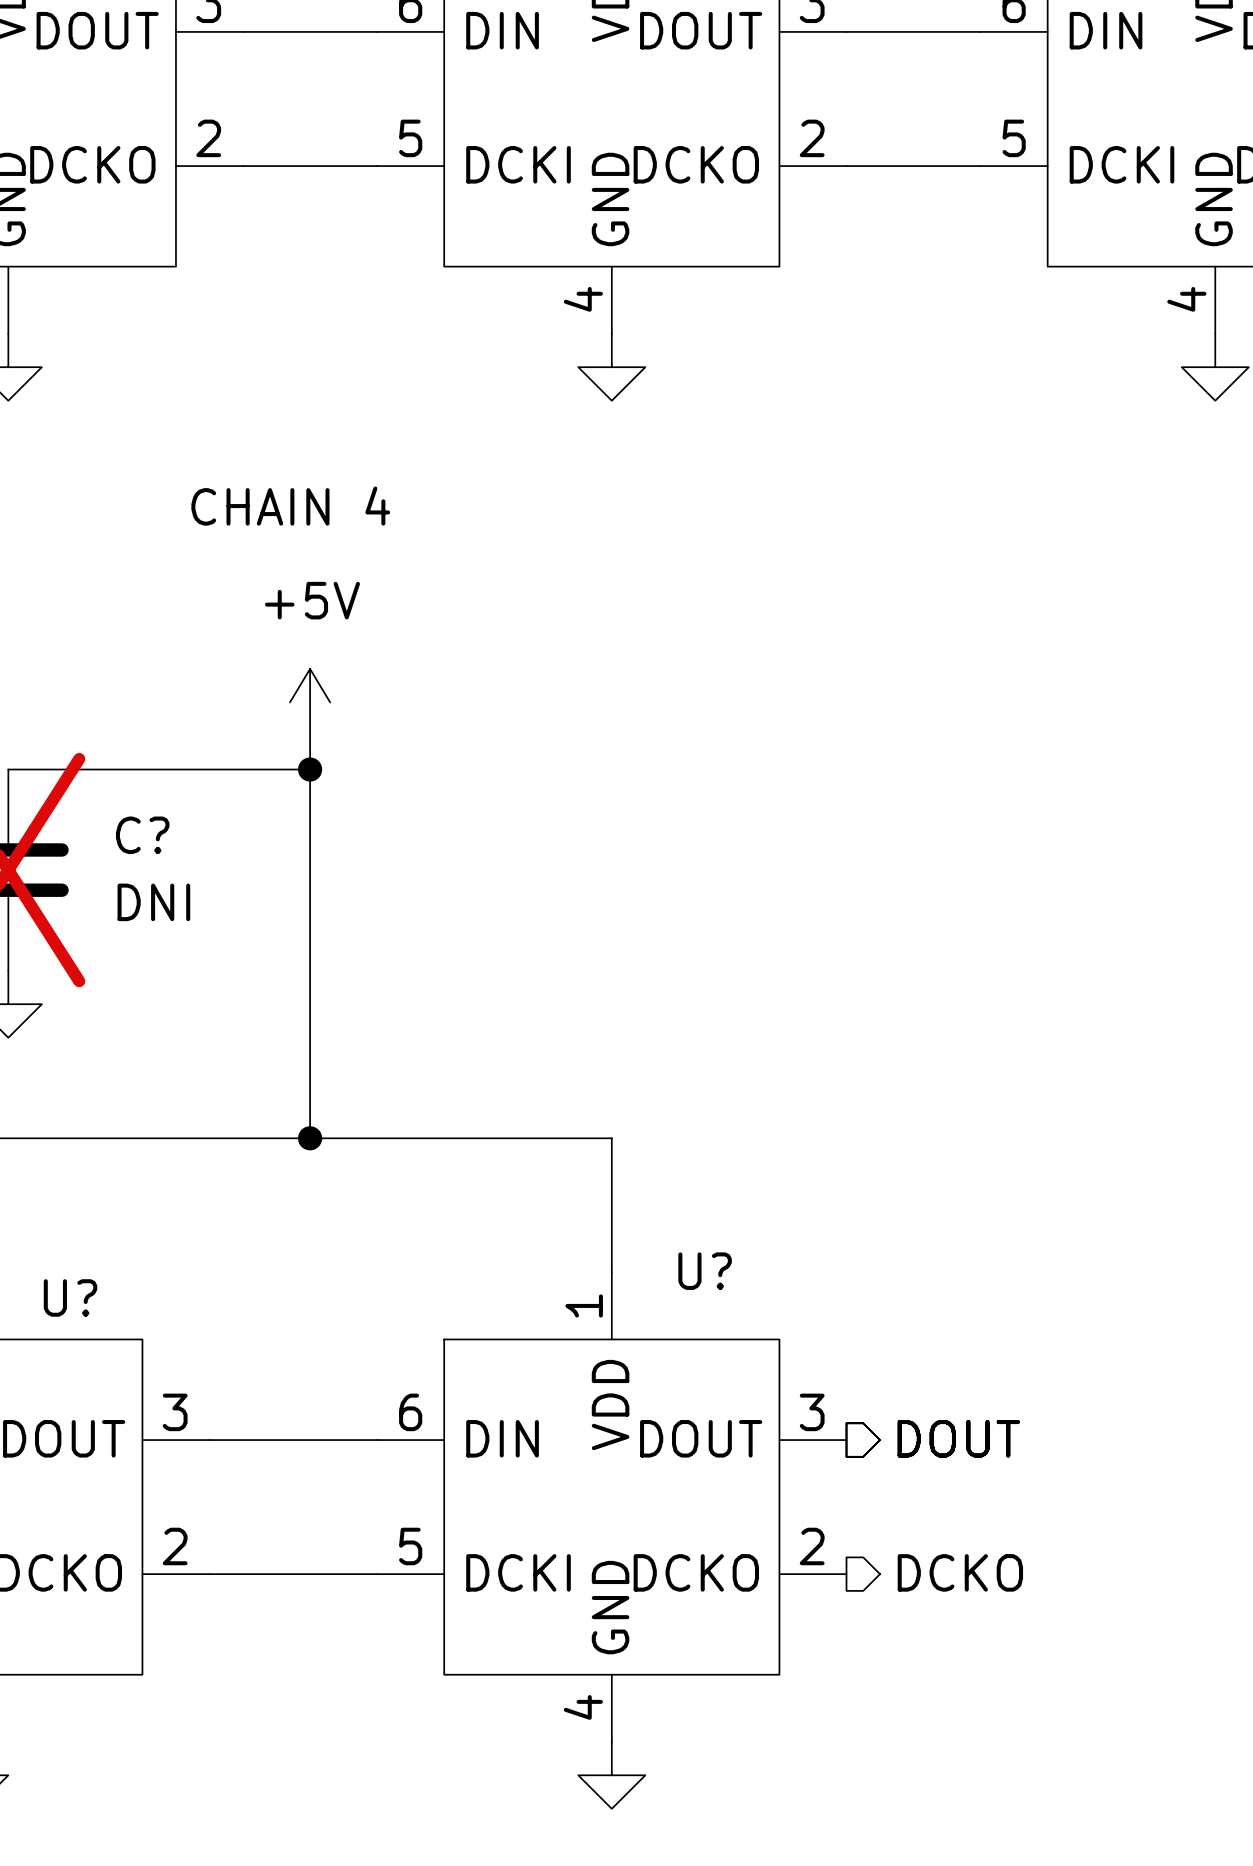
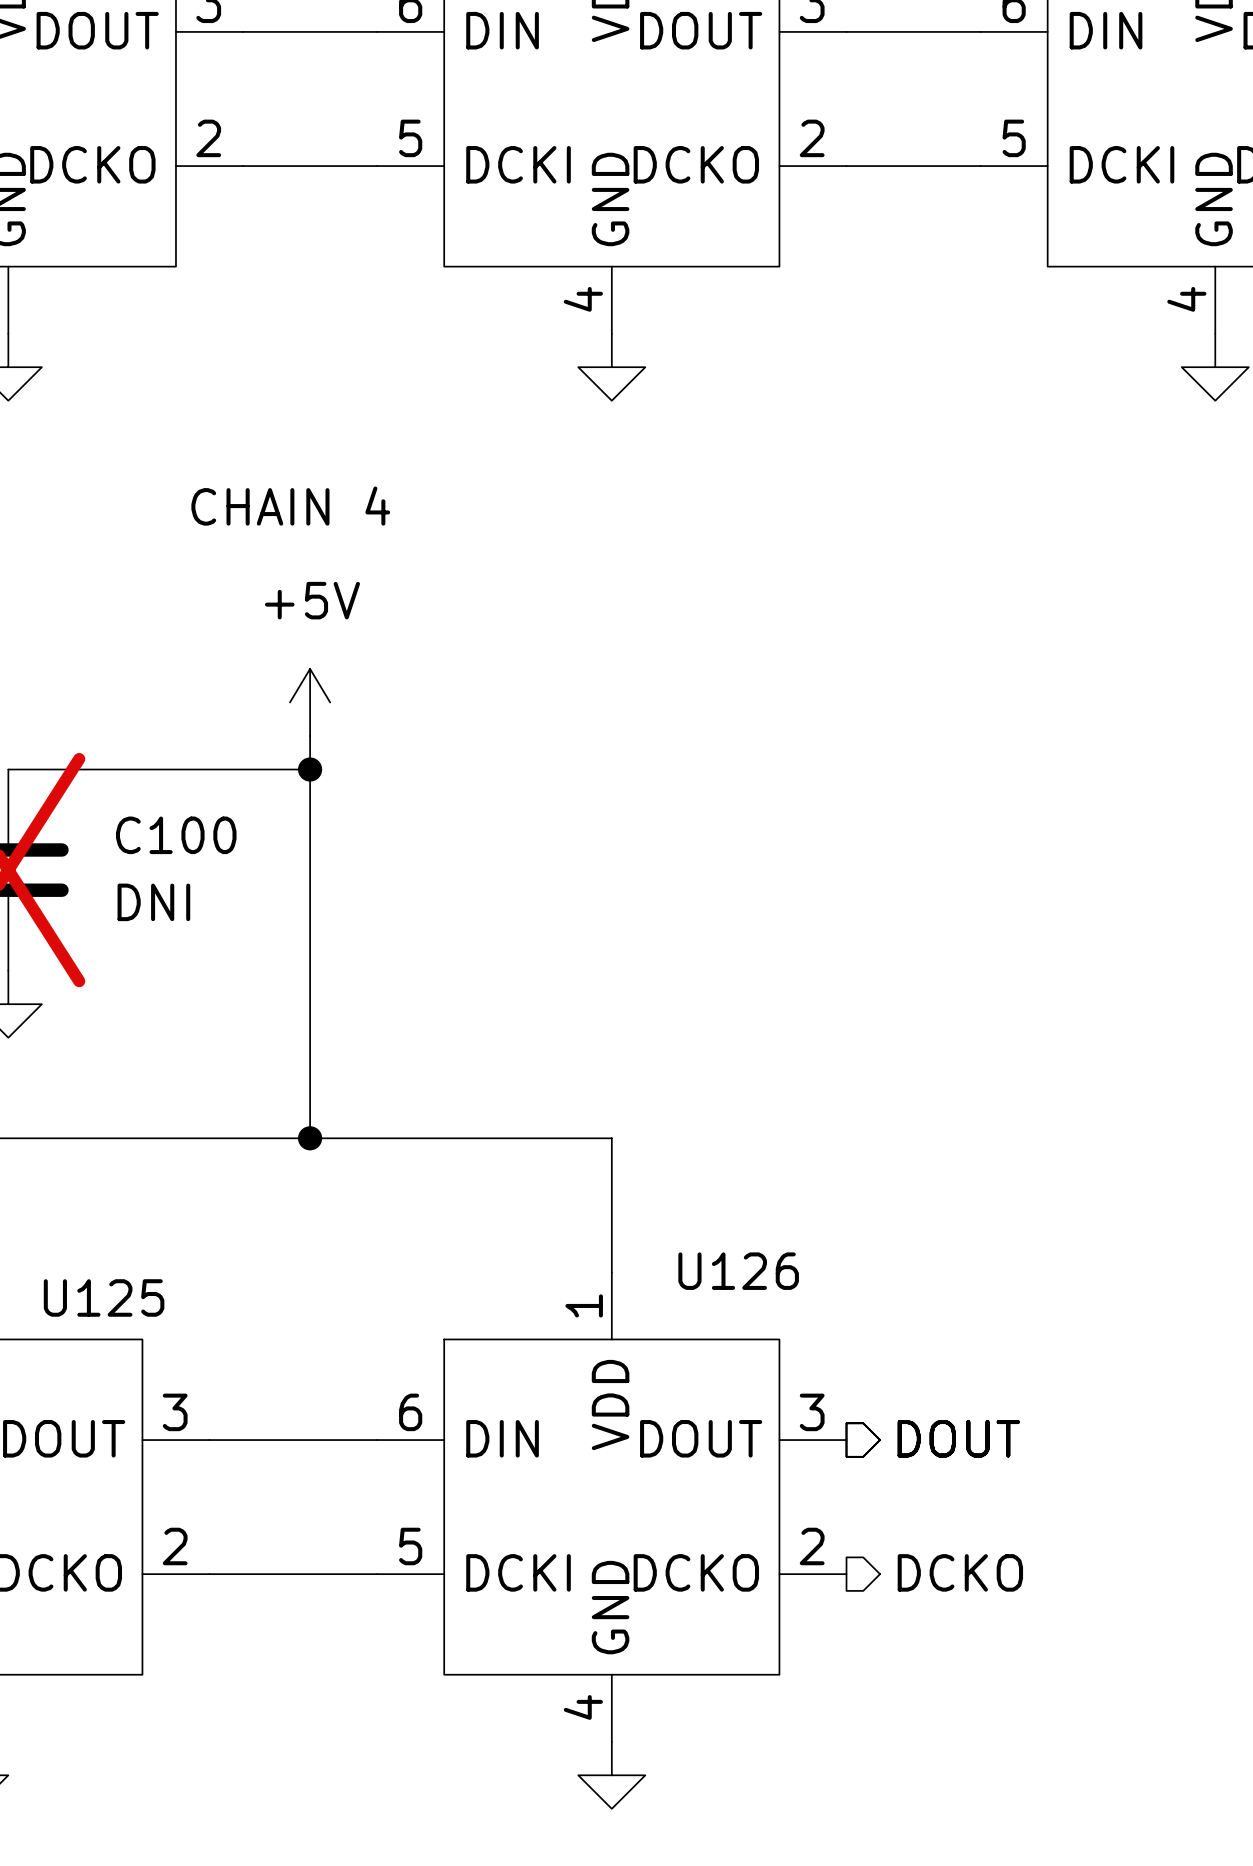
C? name: C? (142, 835) -> C100 (176, 835)
U? name: U? (705, 1271) -> U126 (738, 1271)
U? name: U? (70, 1297) -> U125 (104, 1297)

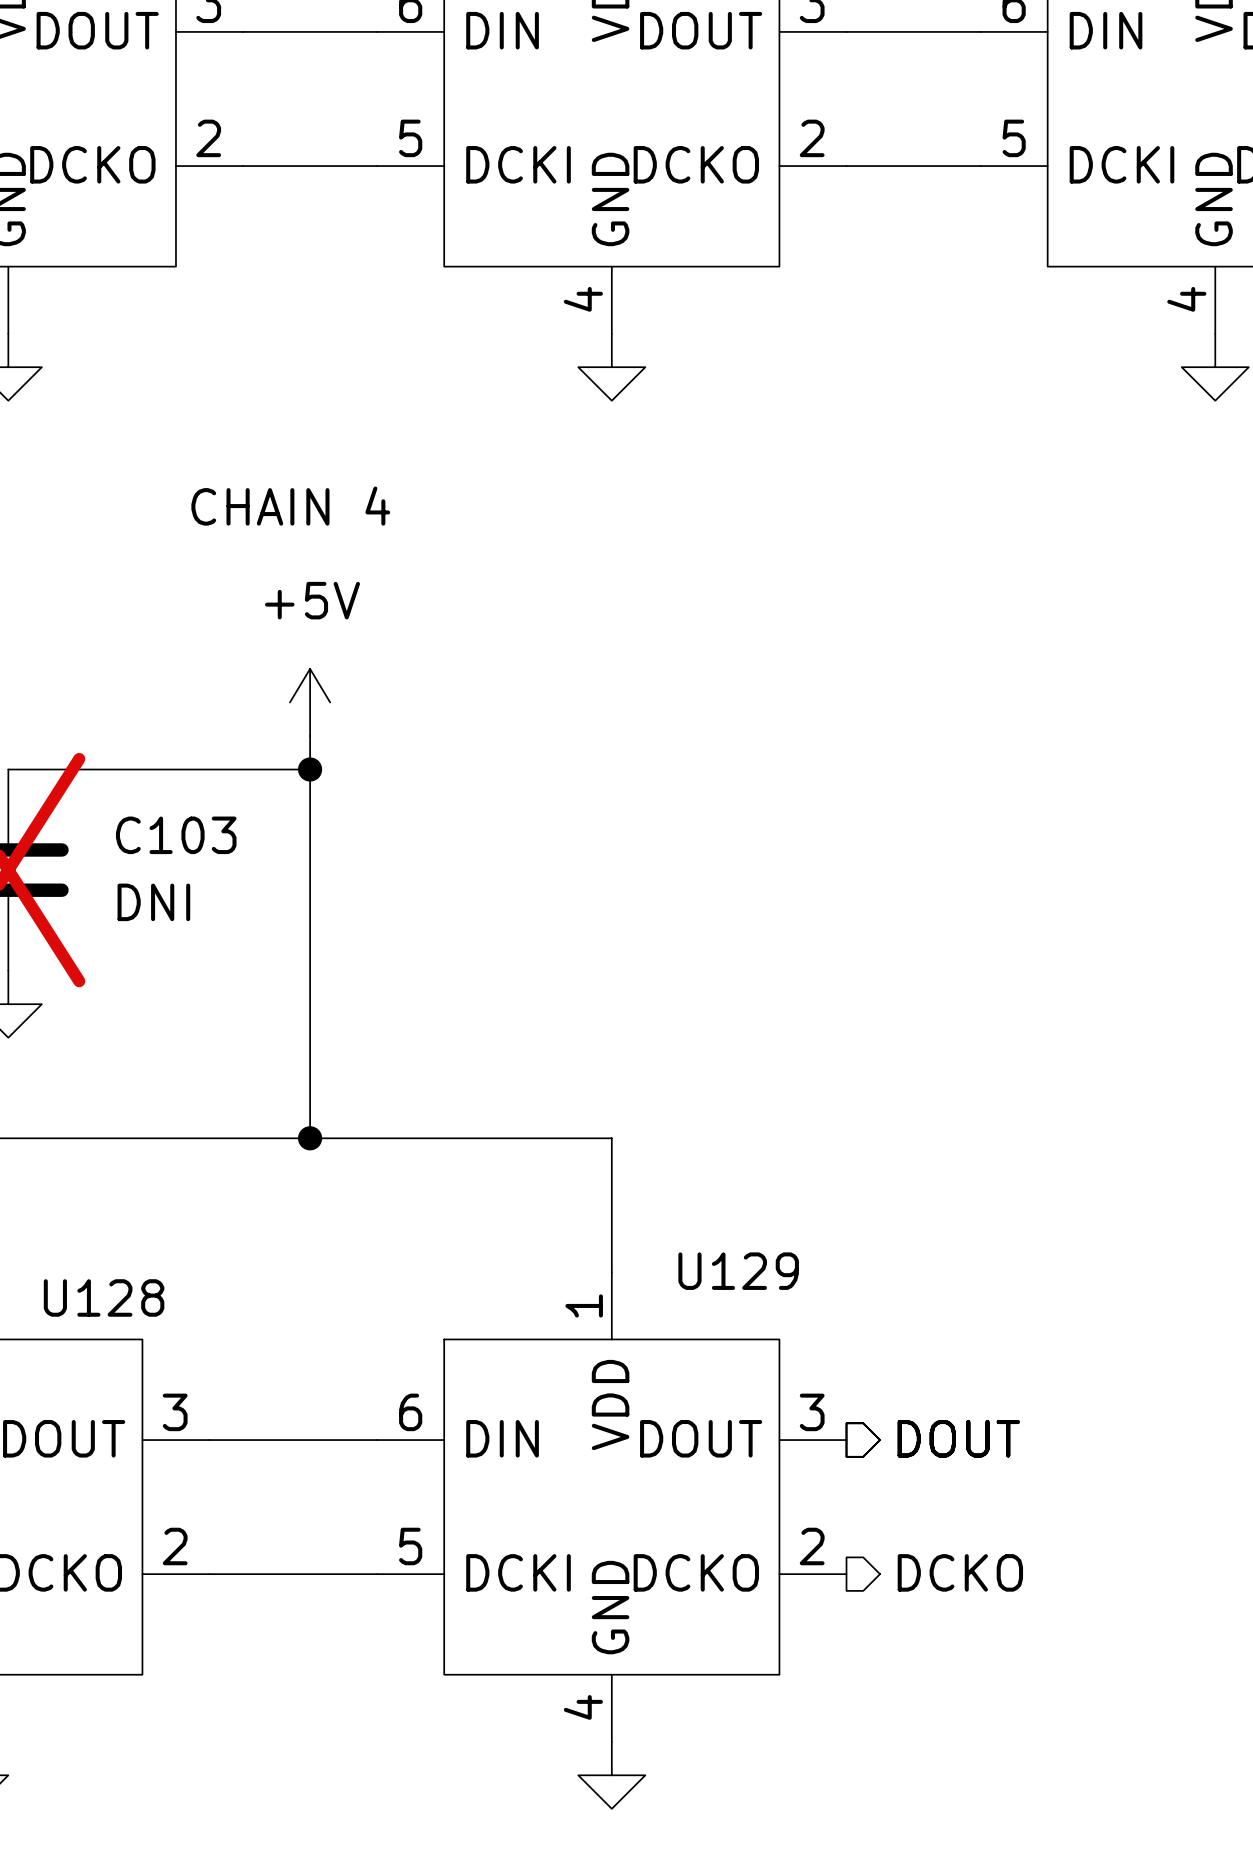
C100 name: C100 (176, 835) -> C103 (176, 835)
U126 name: U126 (738, 1271) -> U129 (738, 1271)
U125 name: U125 (104, 1297) -> U128 (104, 1297)

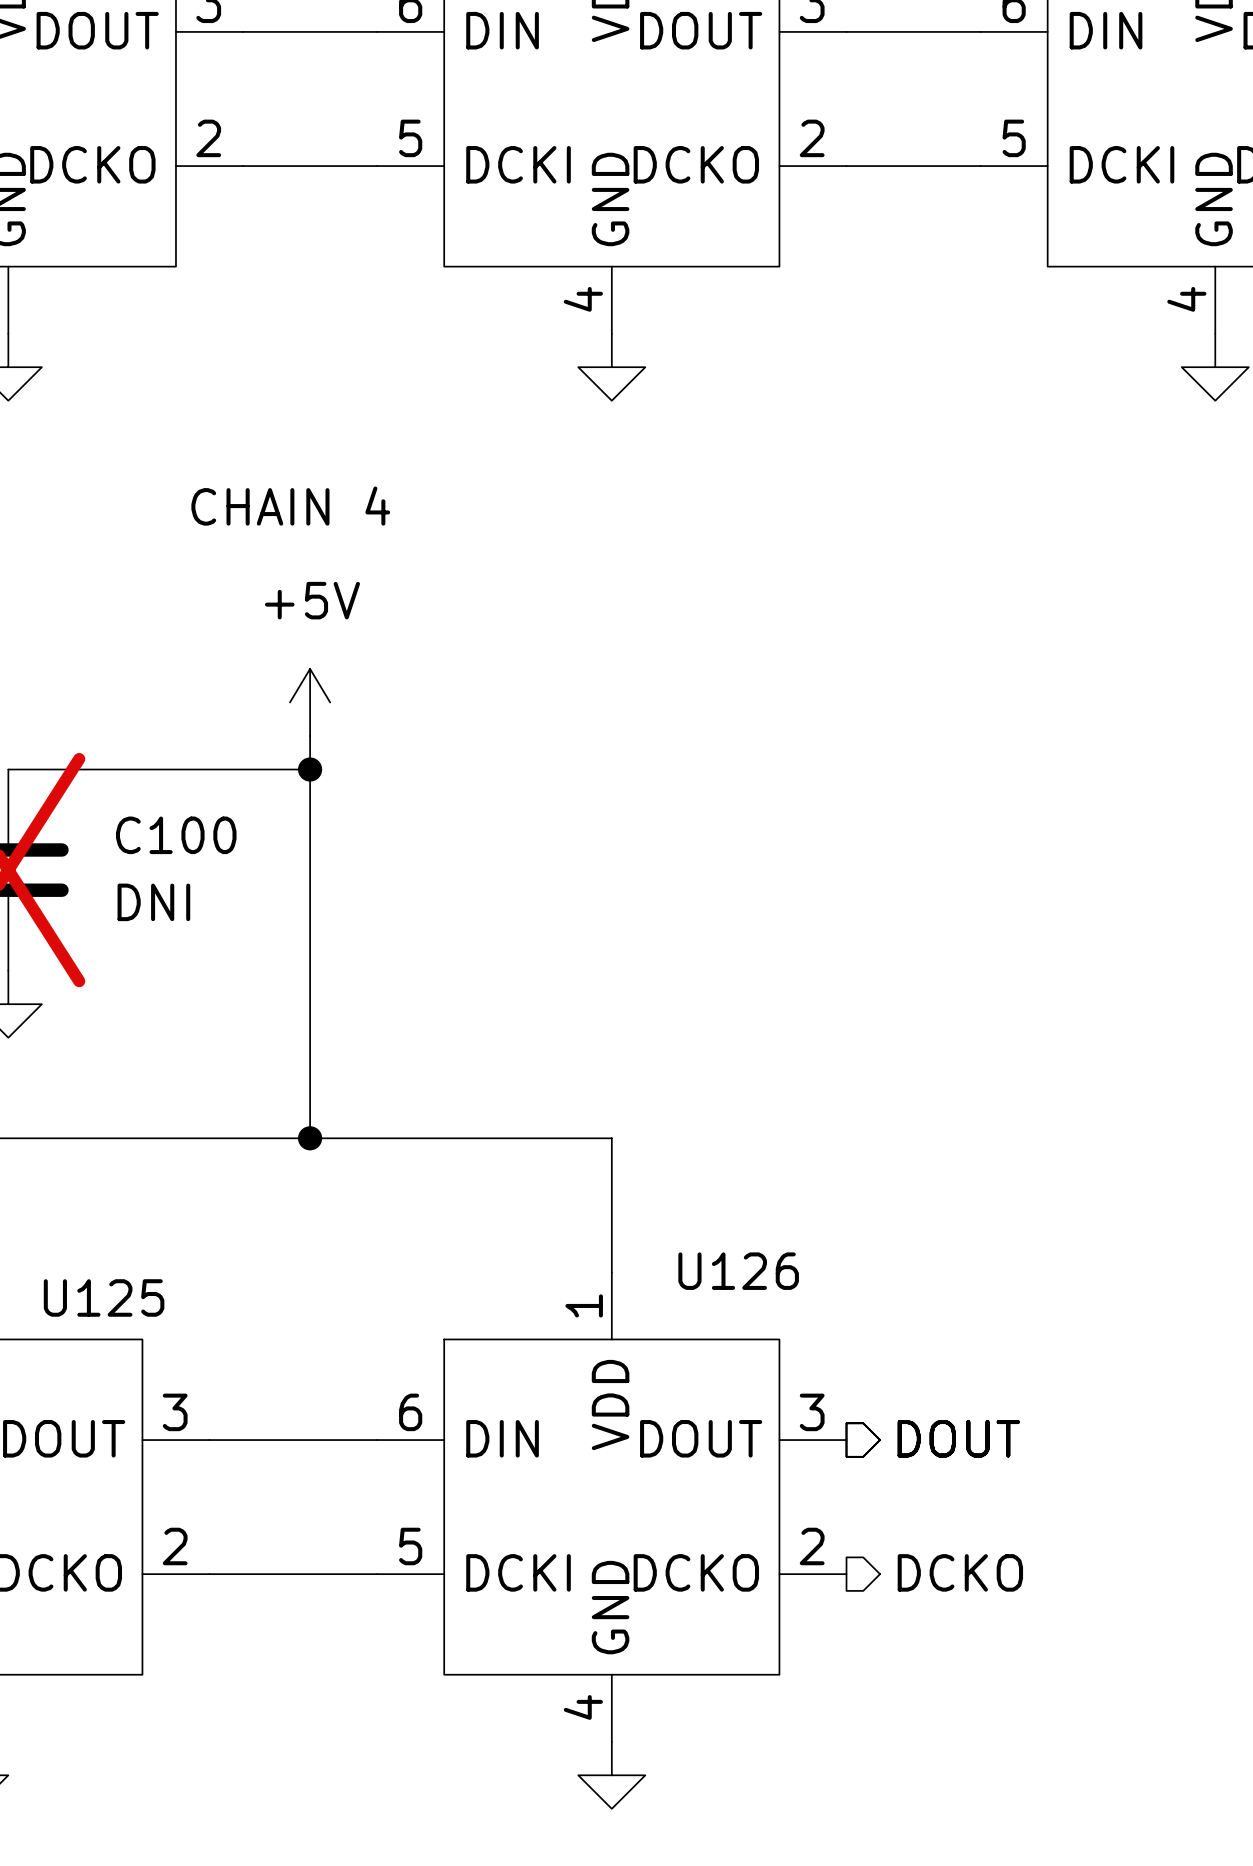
C103 name: C103 (176, 835) -> C100 (176, 835)
U129 name: U129 (738, 1271) -> U126 (738, 1271)
U128 name: U128 (104, 1297) -> U125 (104, 1297)

